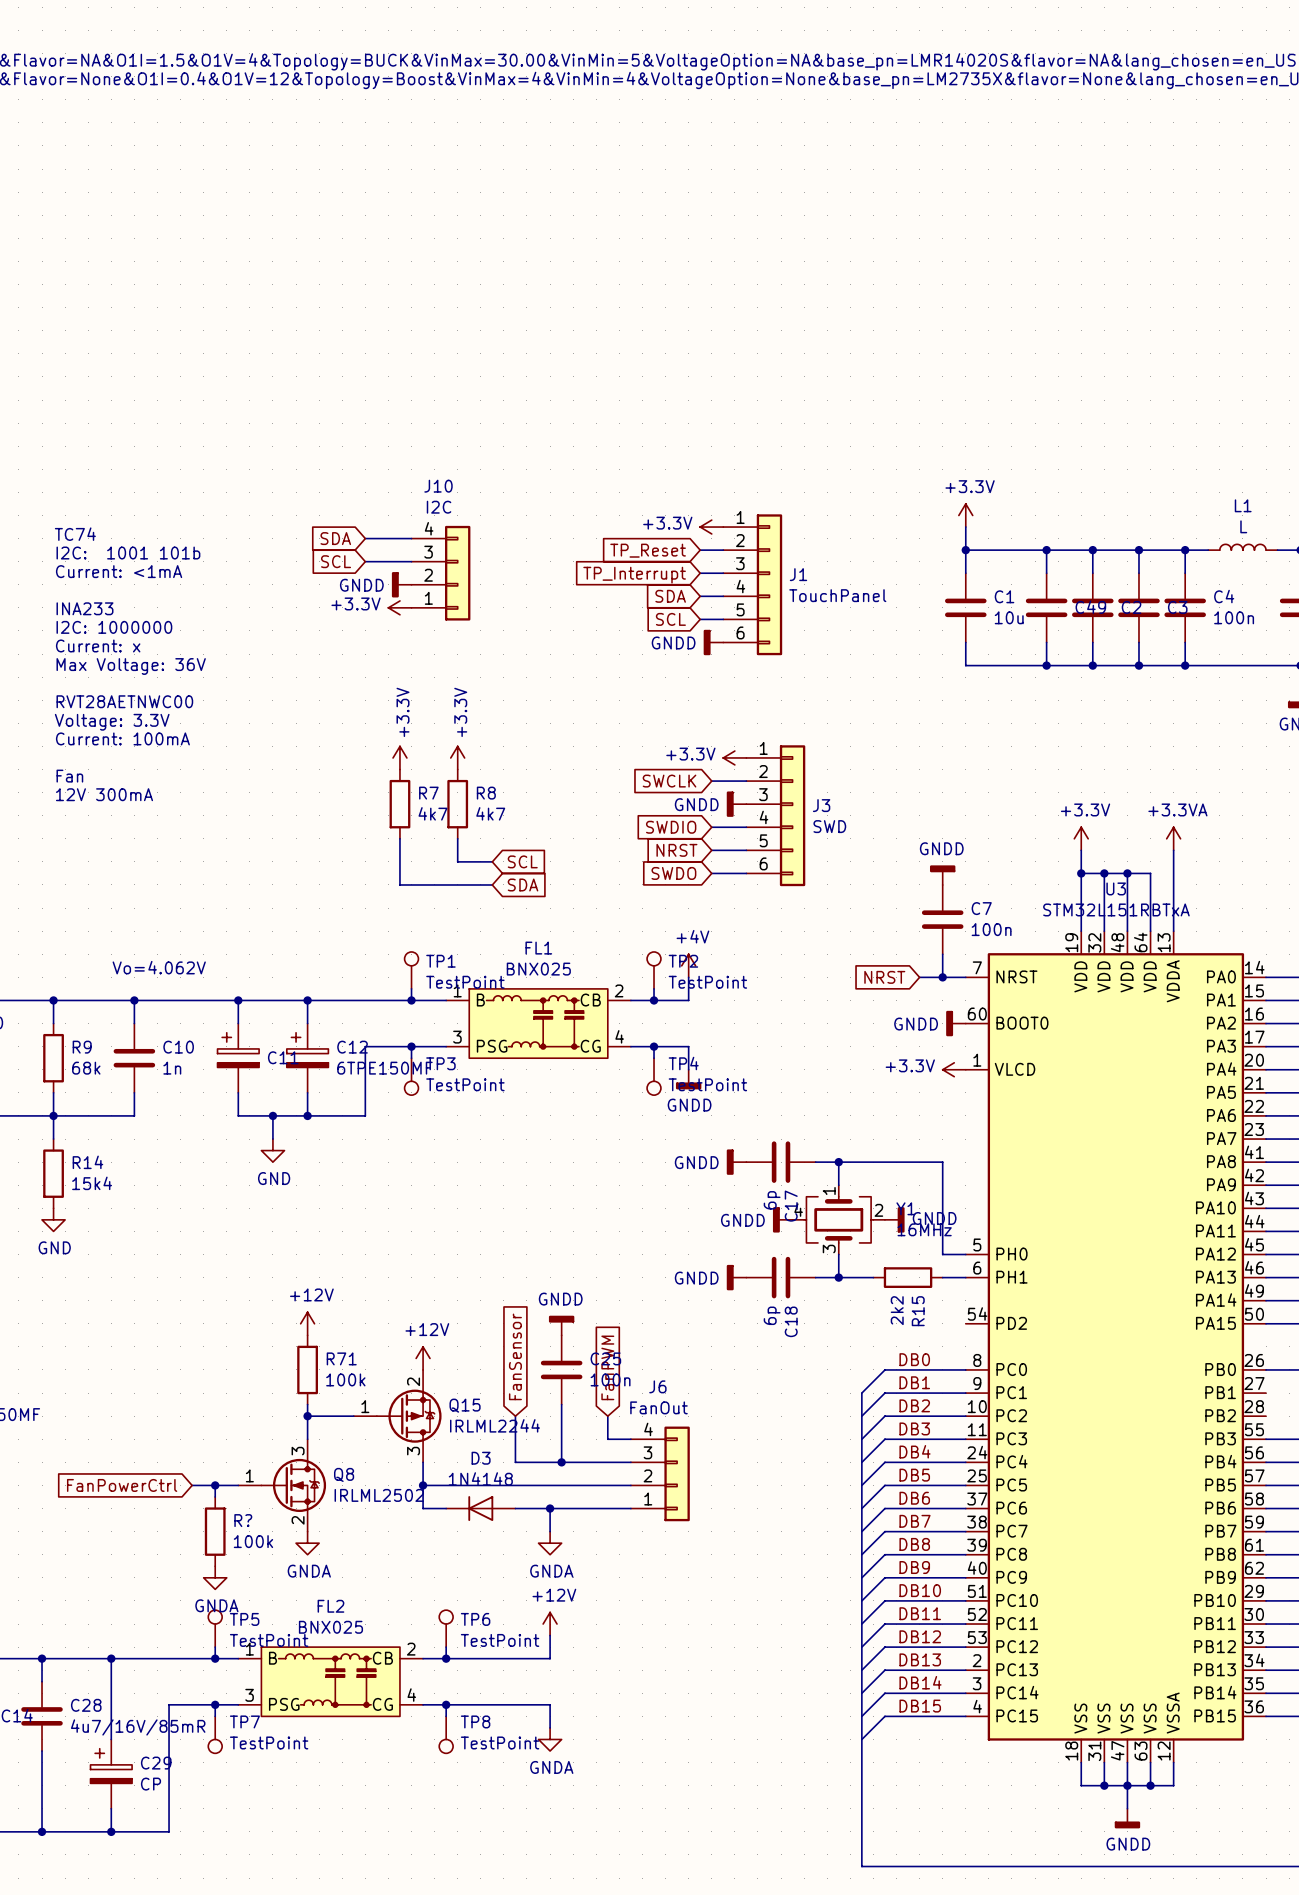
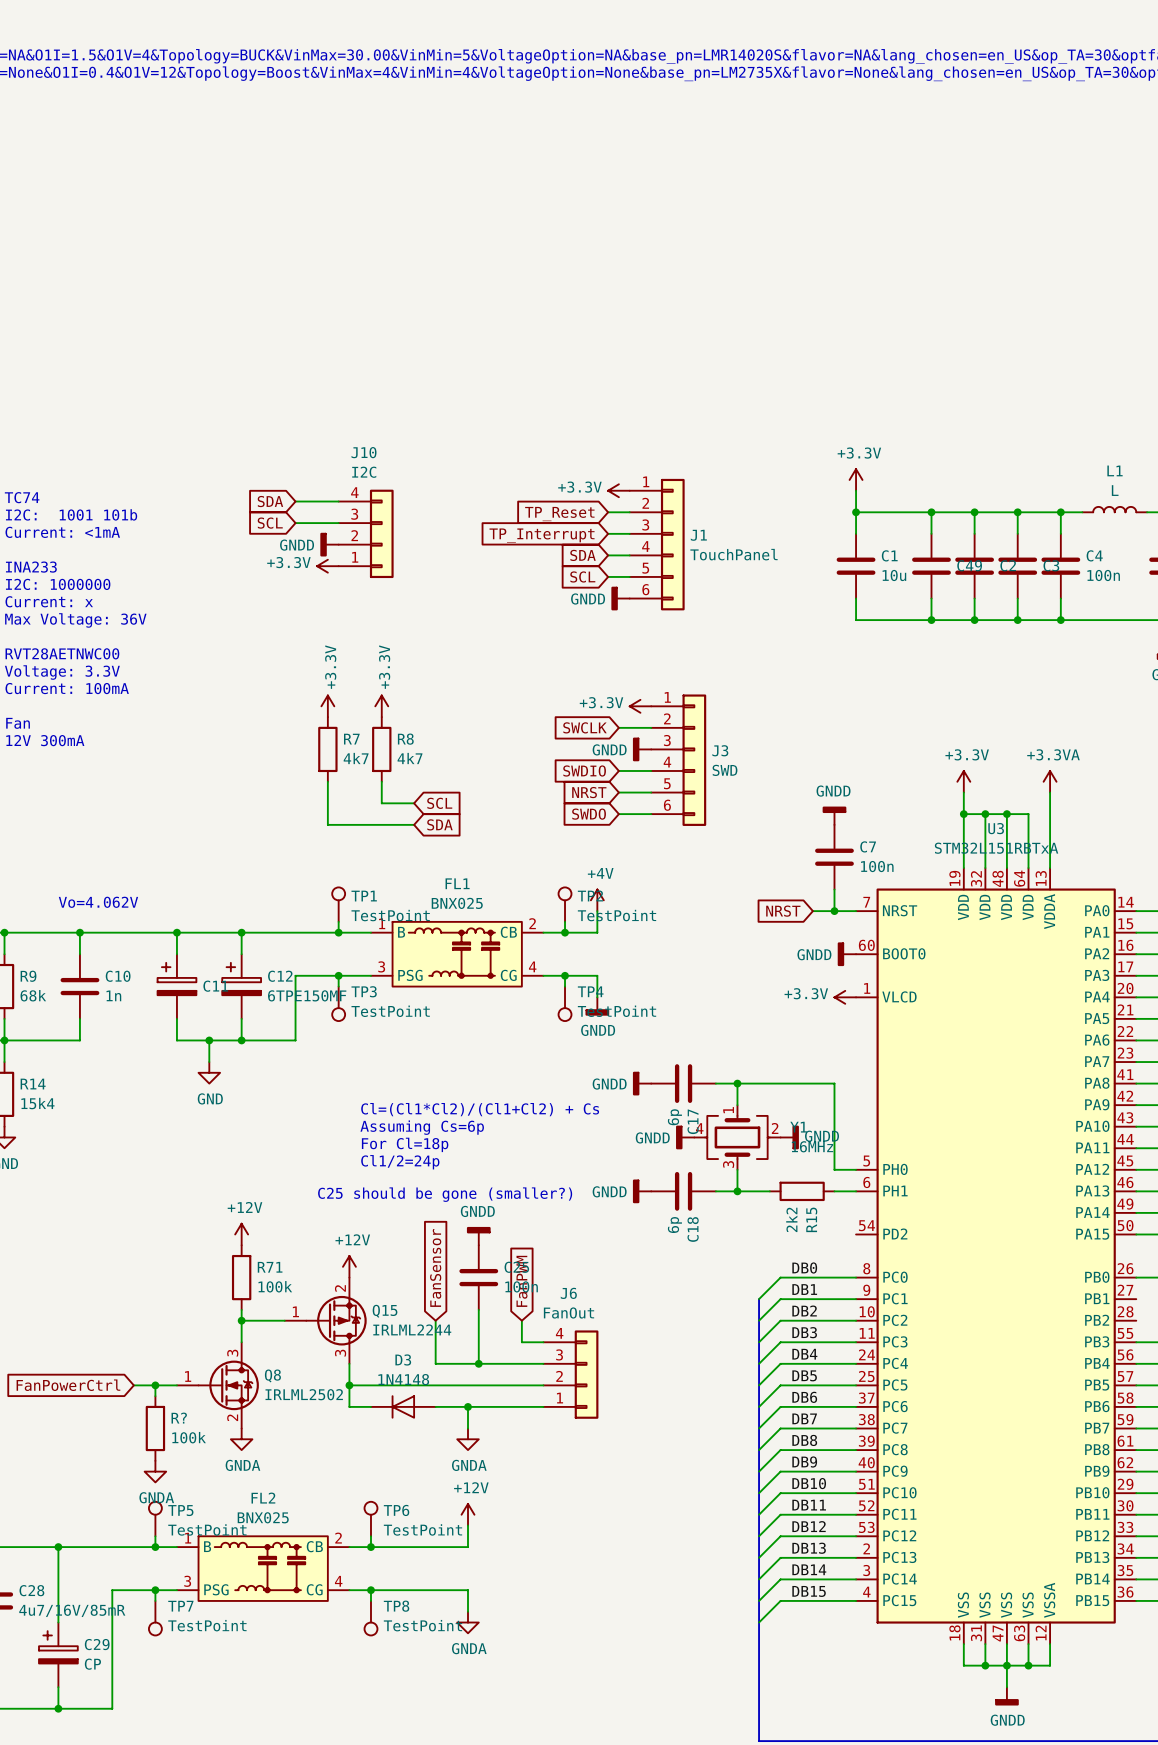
text: none -> Cl=(Cl1*Cl2)/(Cl1+Cl2) + Cs (480, 1109)
text: none -> Assuming Cs=6p (422, 1127)
text: none -> For Cl=18p (405, 1144)
text: none -> Cl1/2=24p (400, 1162)
text: none -> C25 should be gone (smaller?) (445, 1194)

